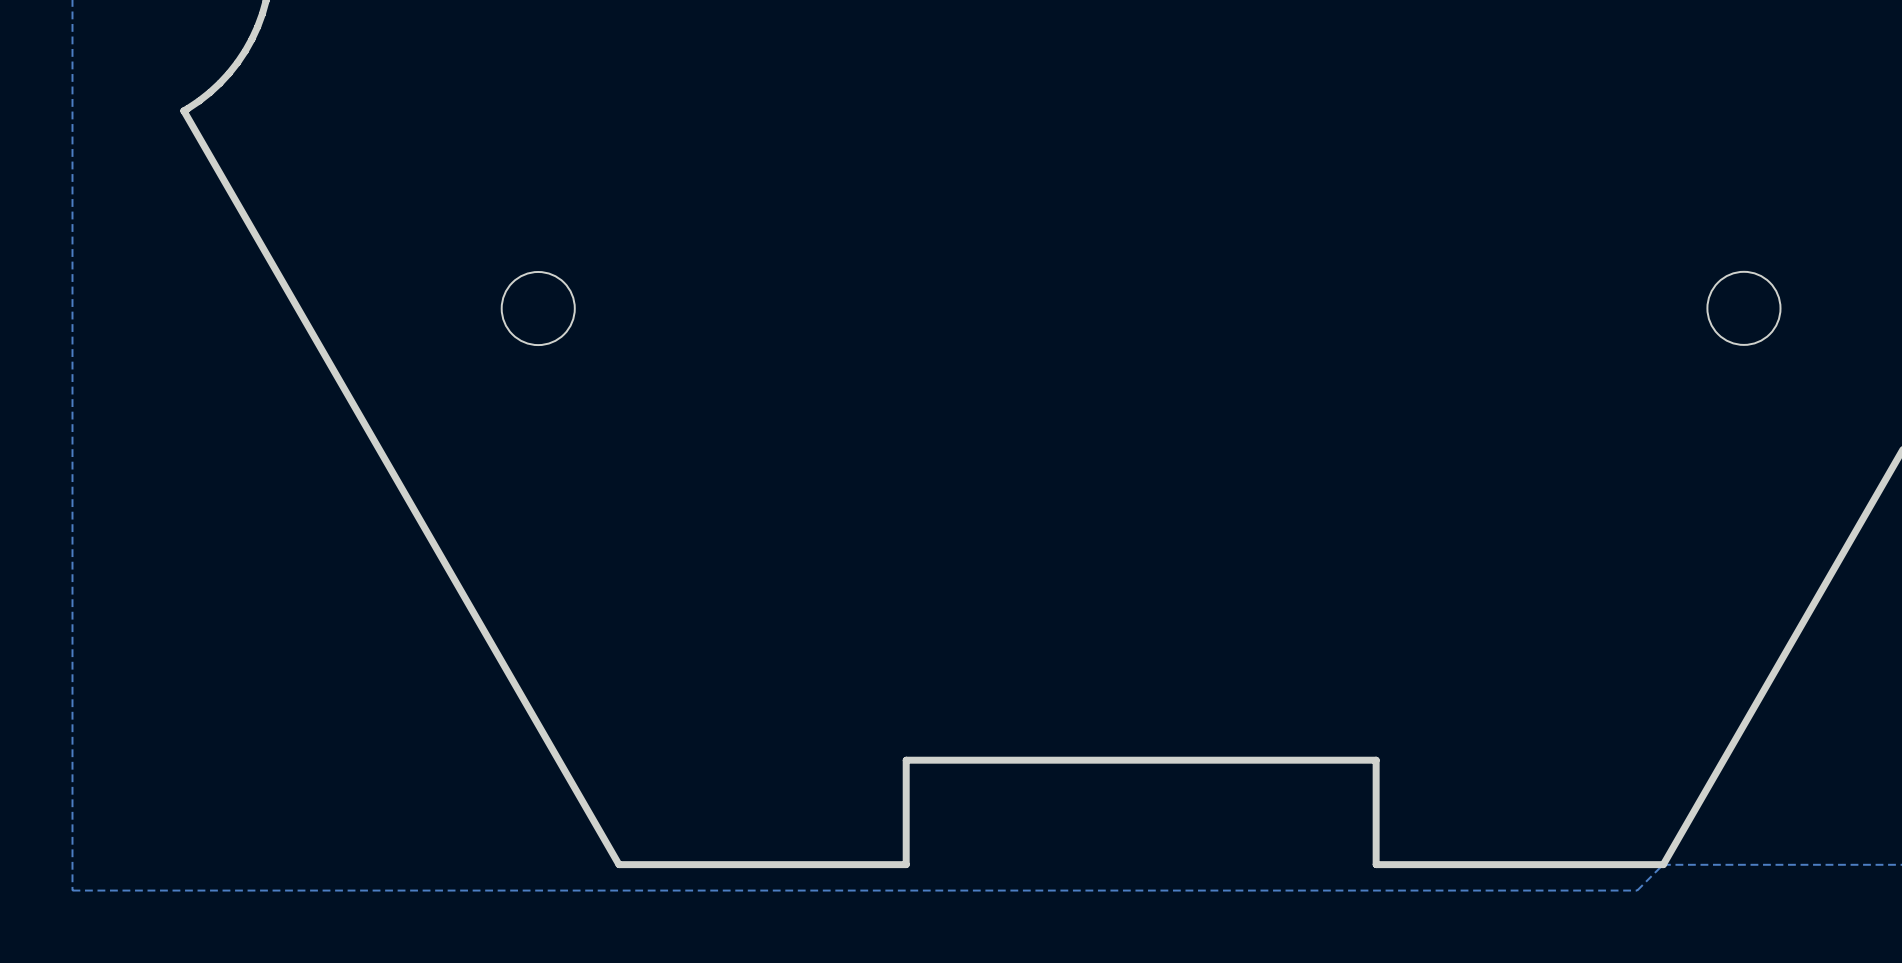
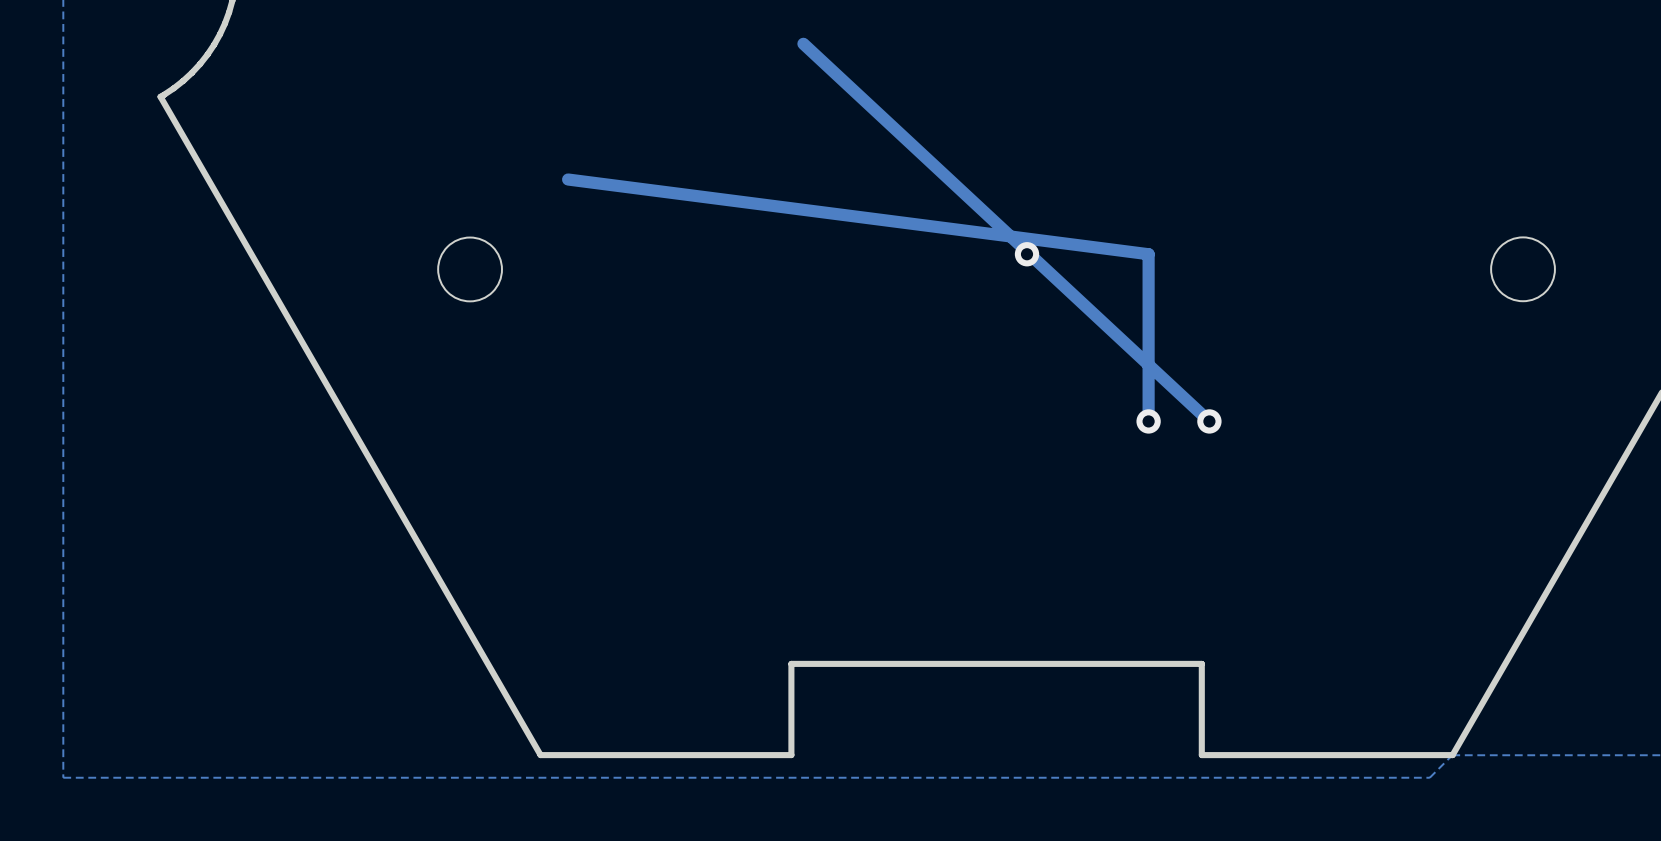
track: none -> (803, 43) (1209, 421)
track: none -> (568, 179) (1148, 254) (1148, 421)
via: none -> (1027, 254)
via: none -> (1148, 421)
via: none -> (1209, 421)

